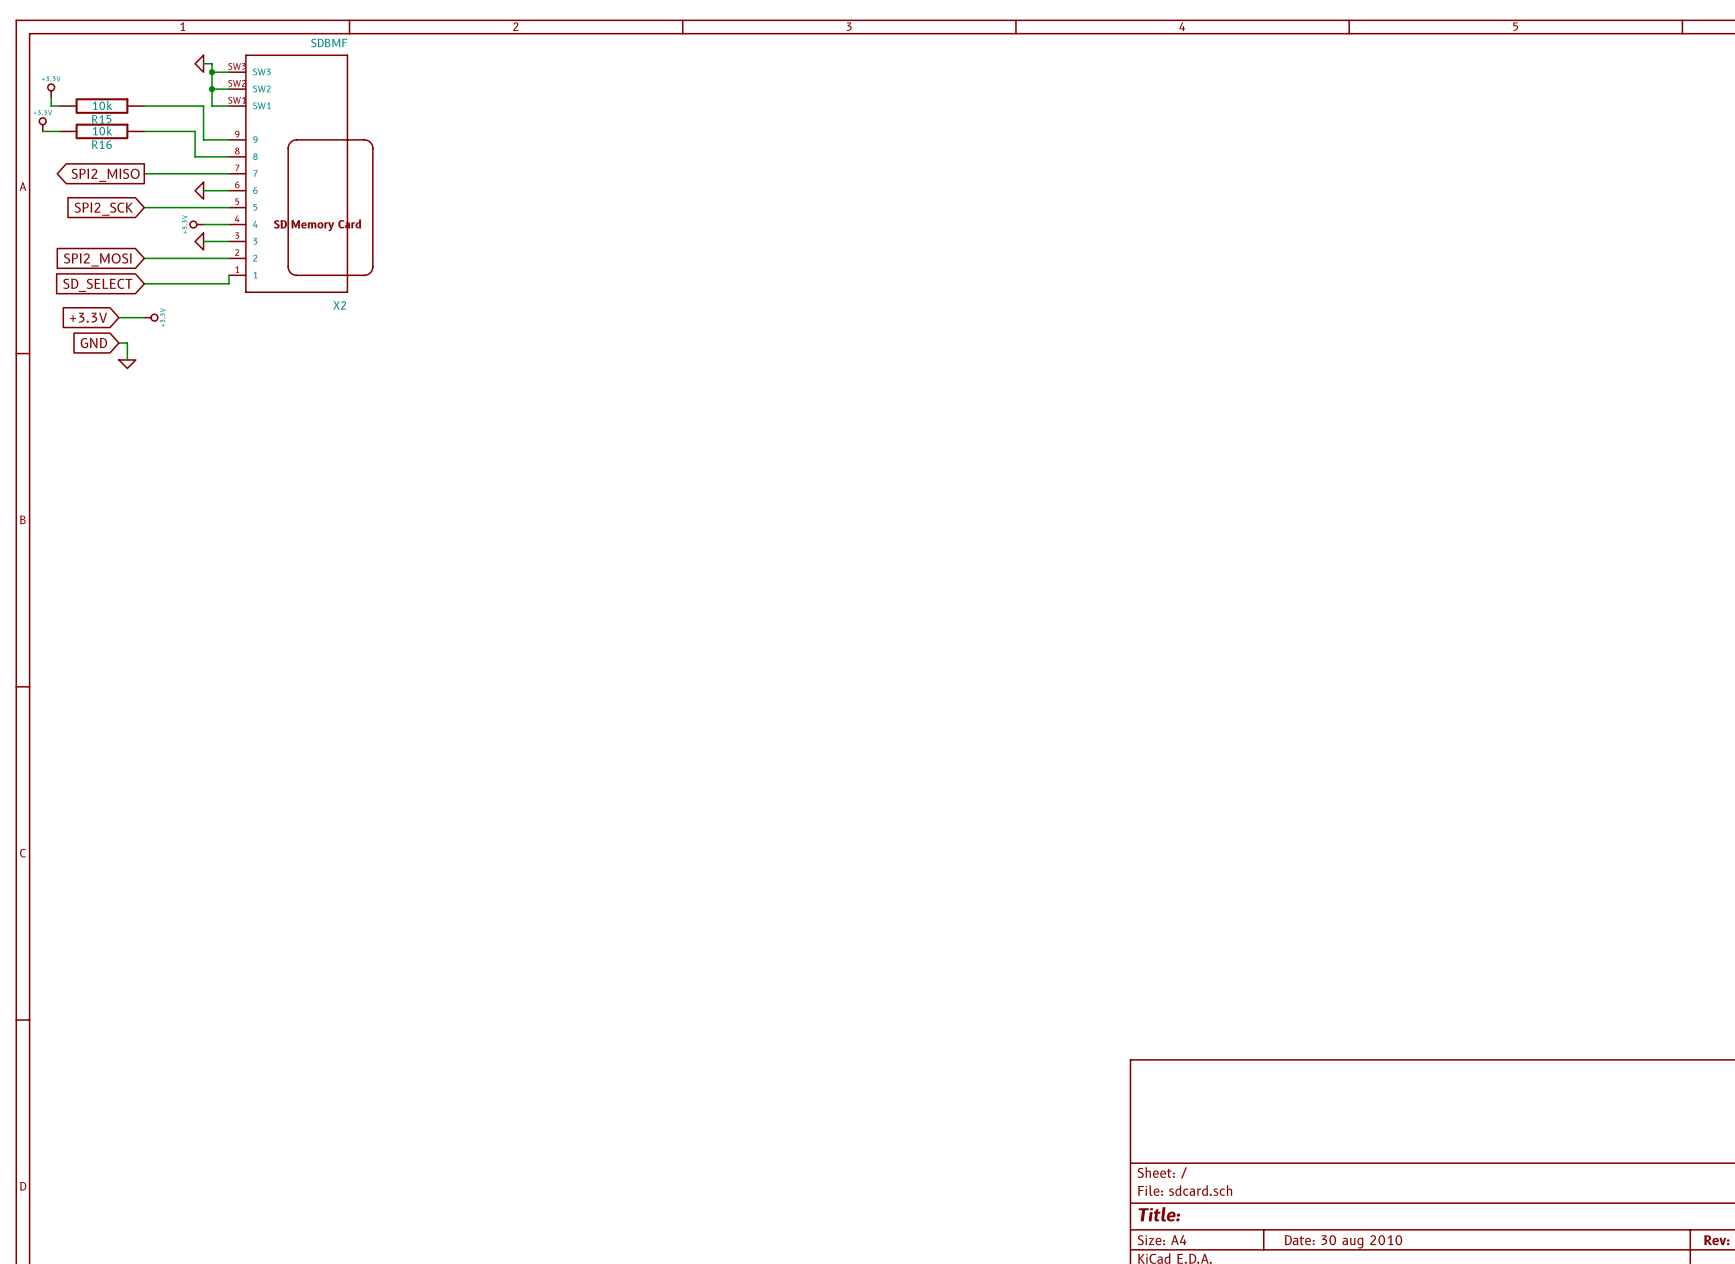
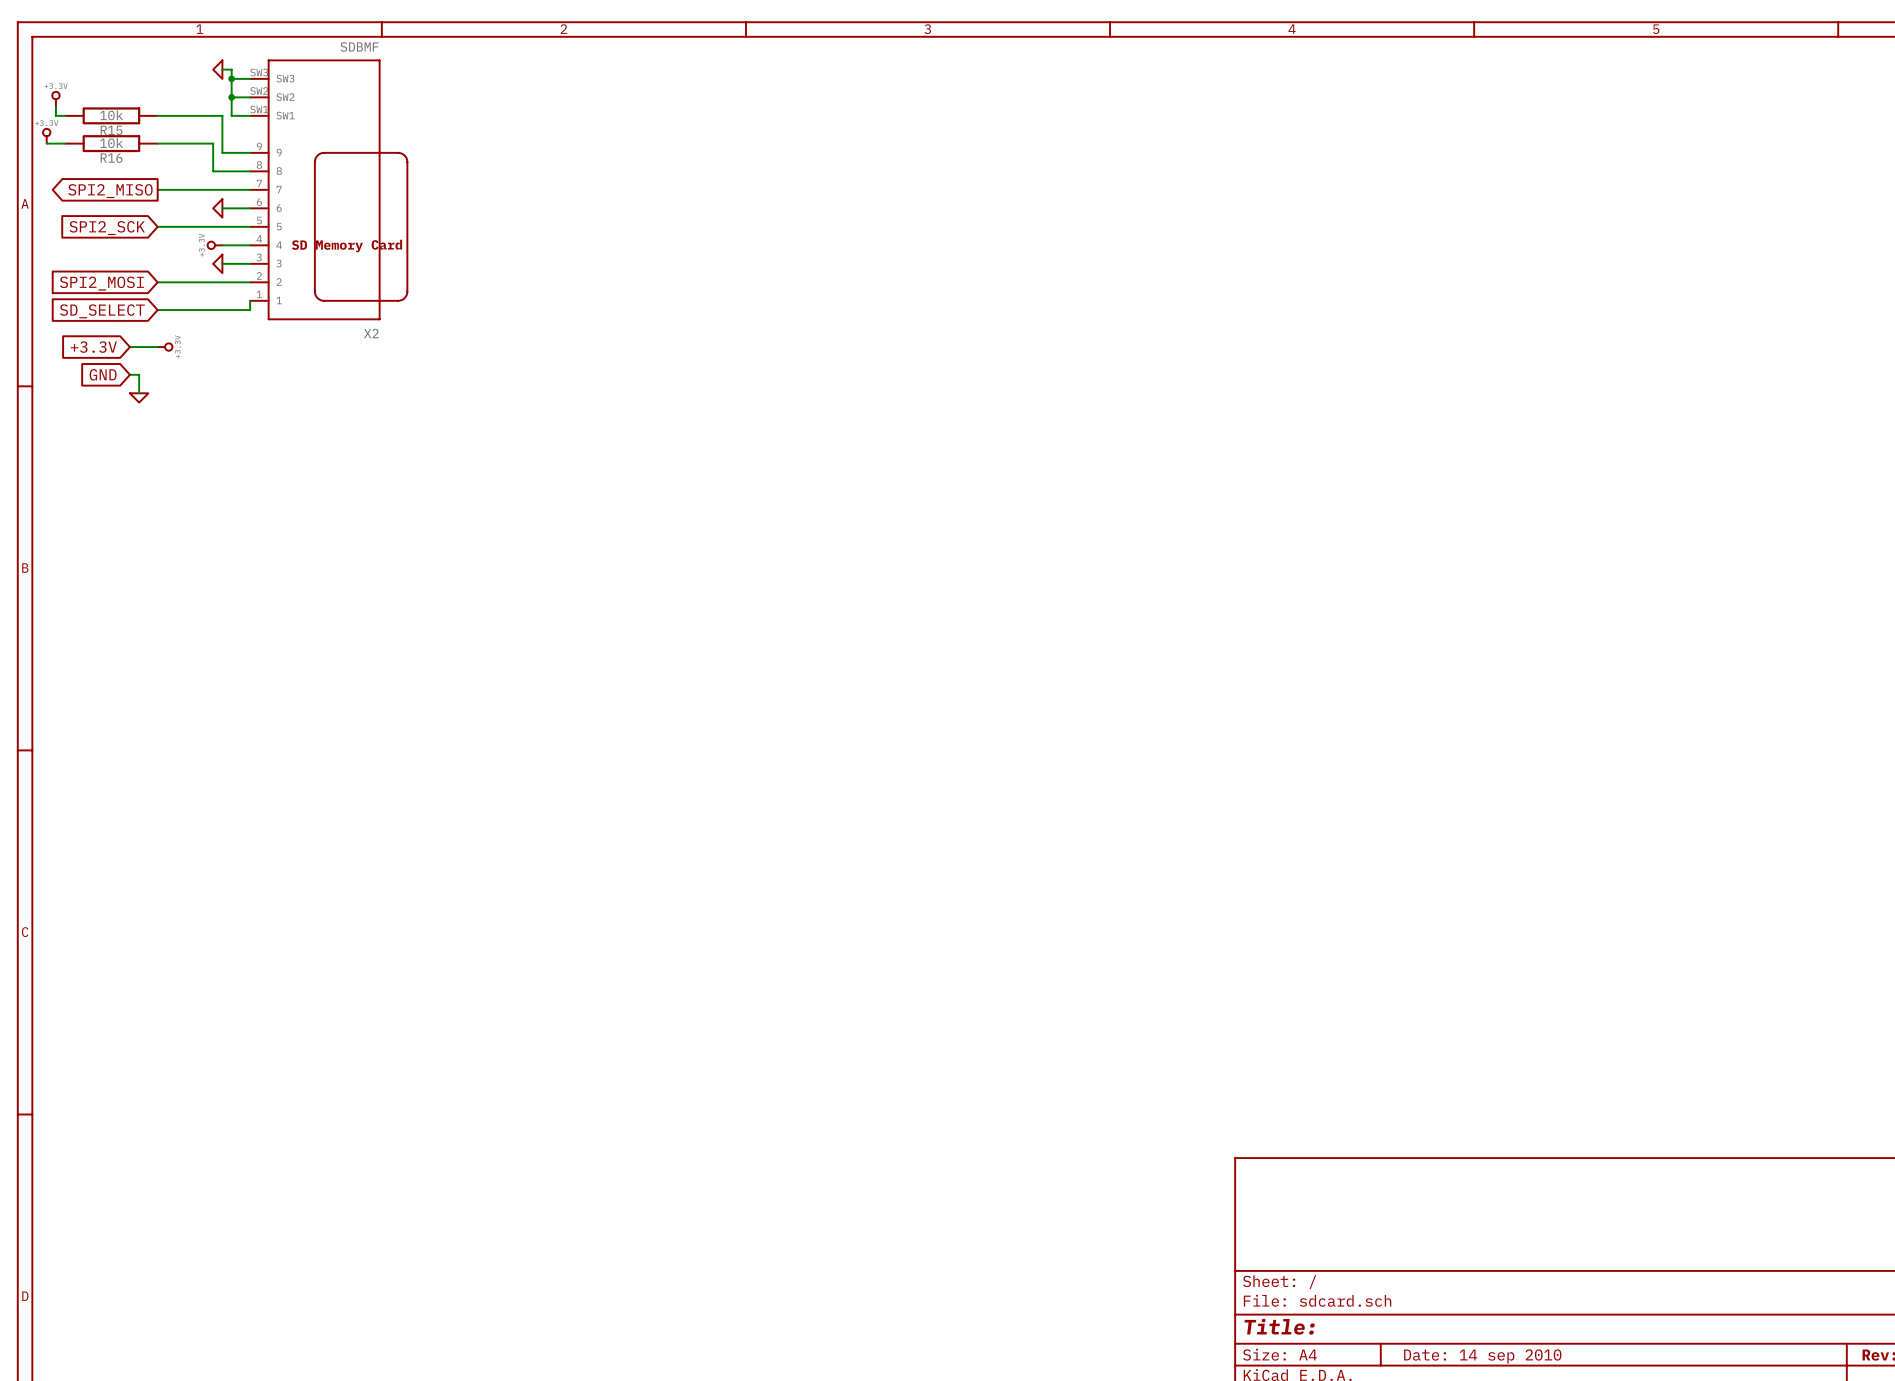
title block: Date: 30 aug 2010 (1343, 1241) -> Date: 14 sep 2010 (1482, 1356)

